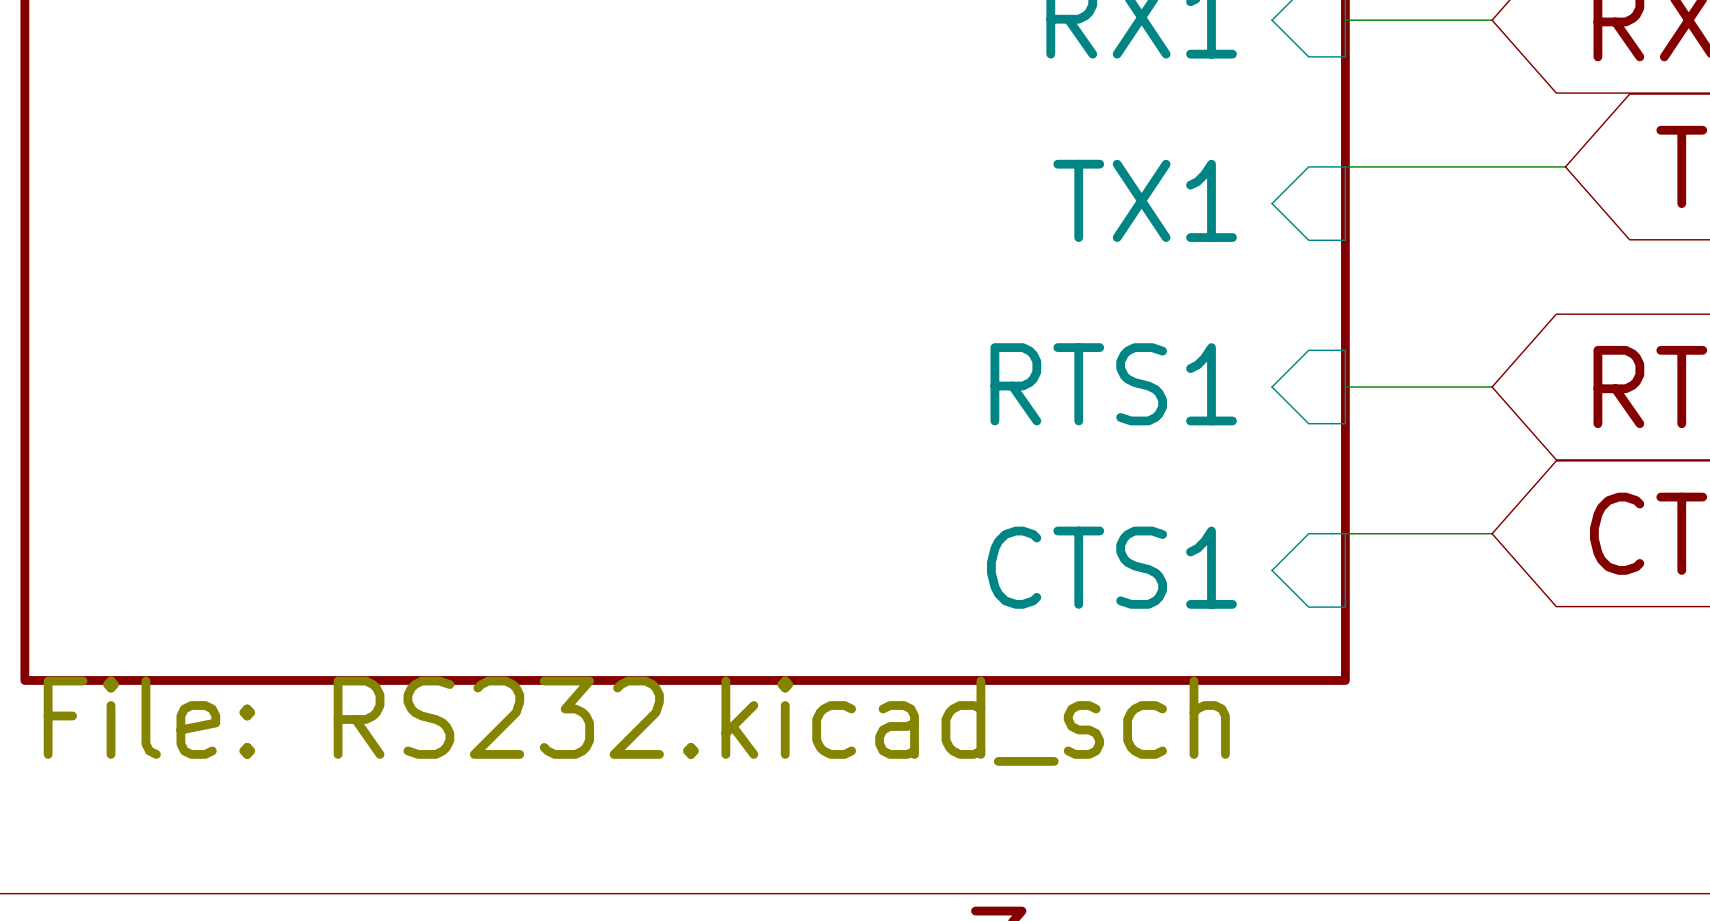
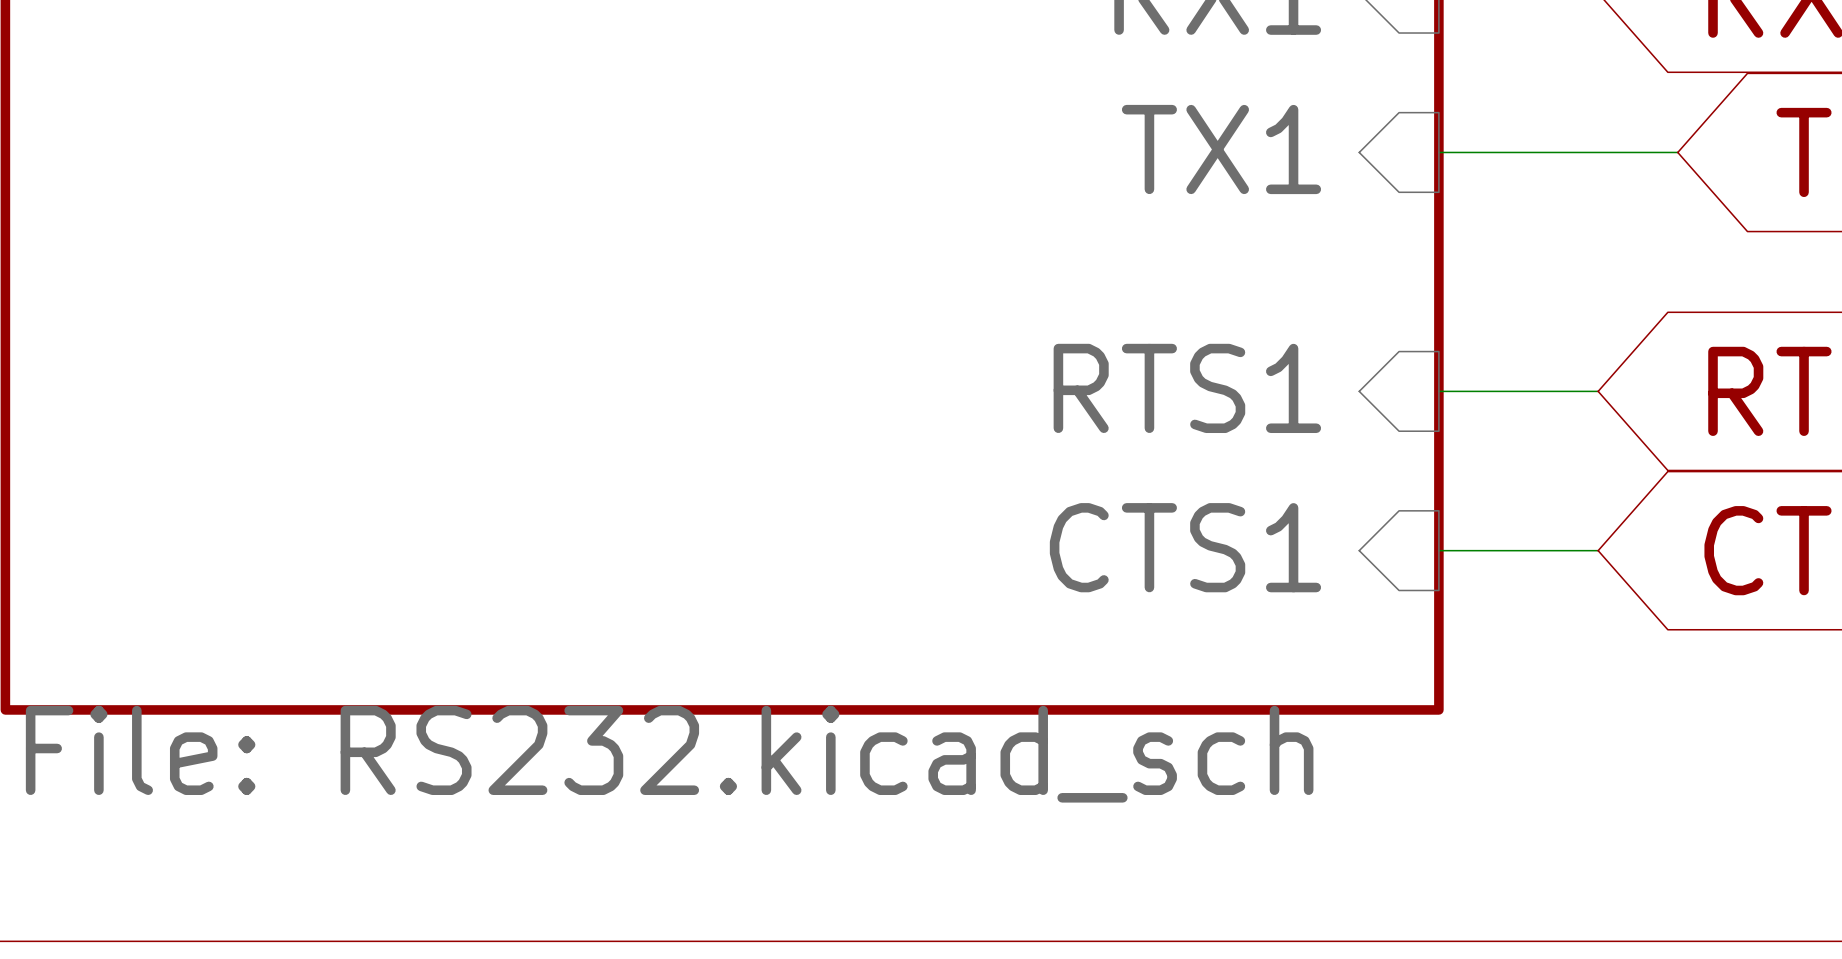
sheet pin position: TX1 (1145, 200) -> TX1 (1221, 149)
sheet pin position: CTS1 (1111, 567) -> CTS1 (1185, 547)

